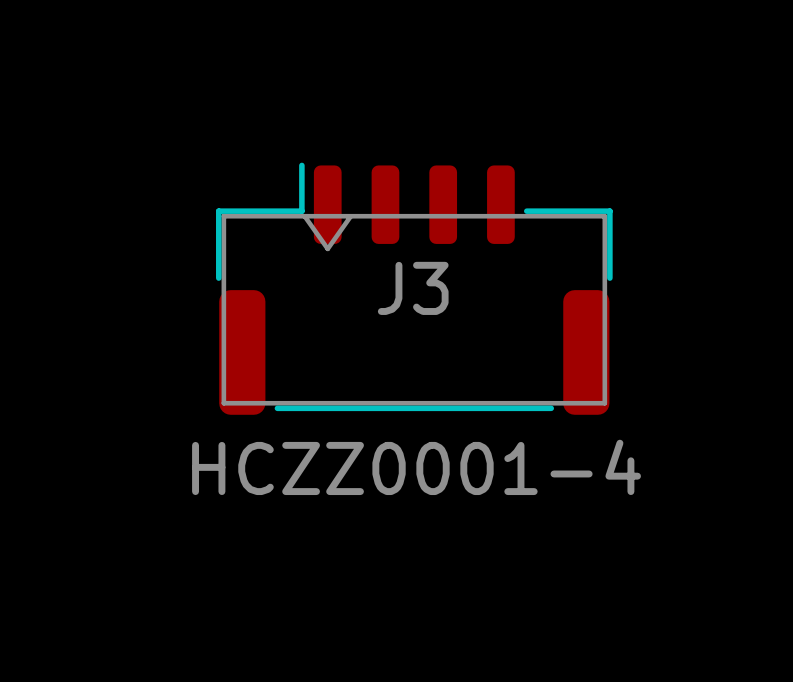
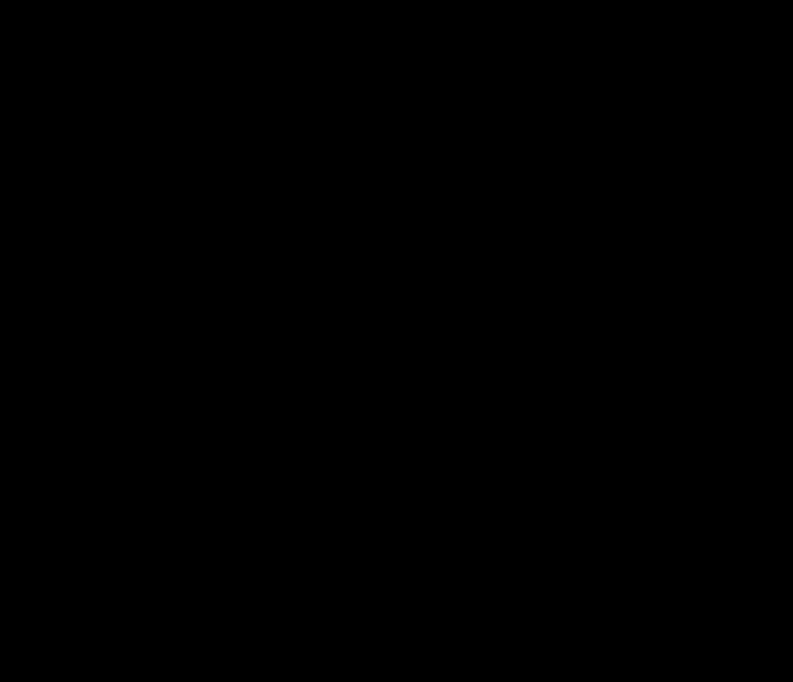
J3: HCZZ0001-4 (414, 288) -> none

